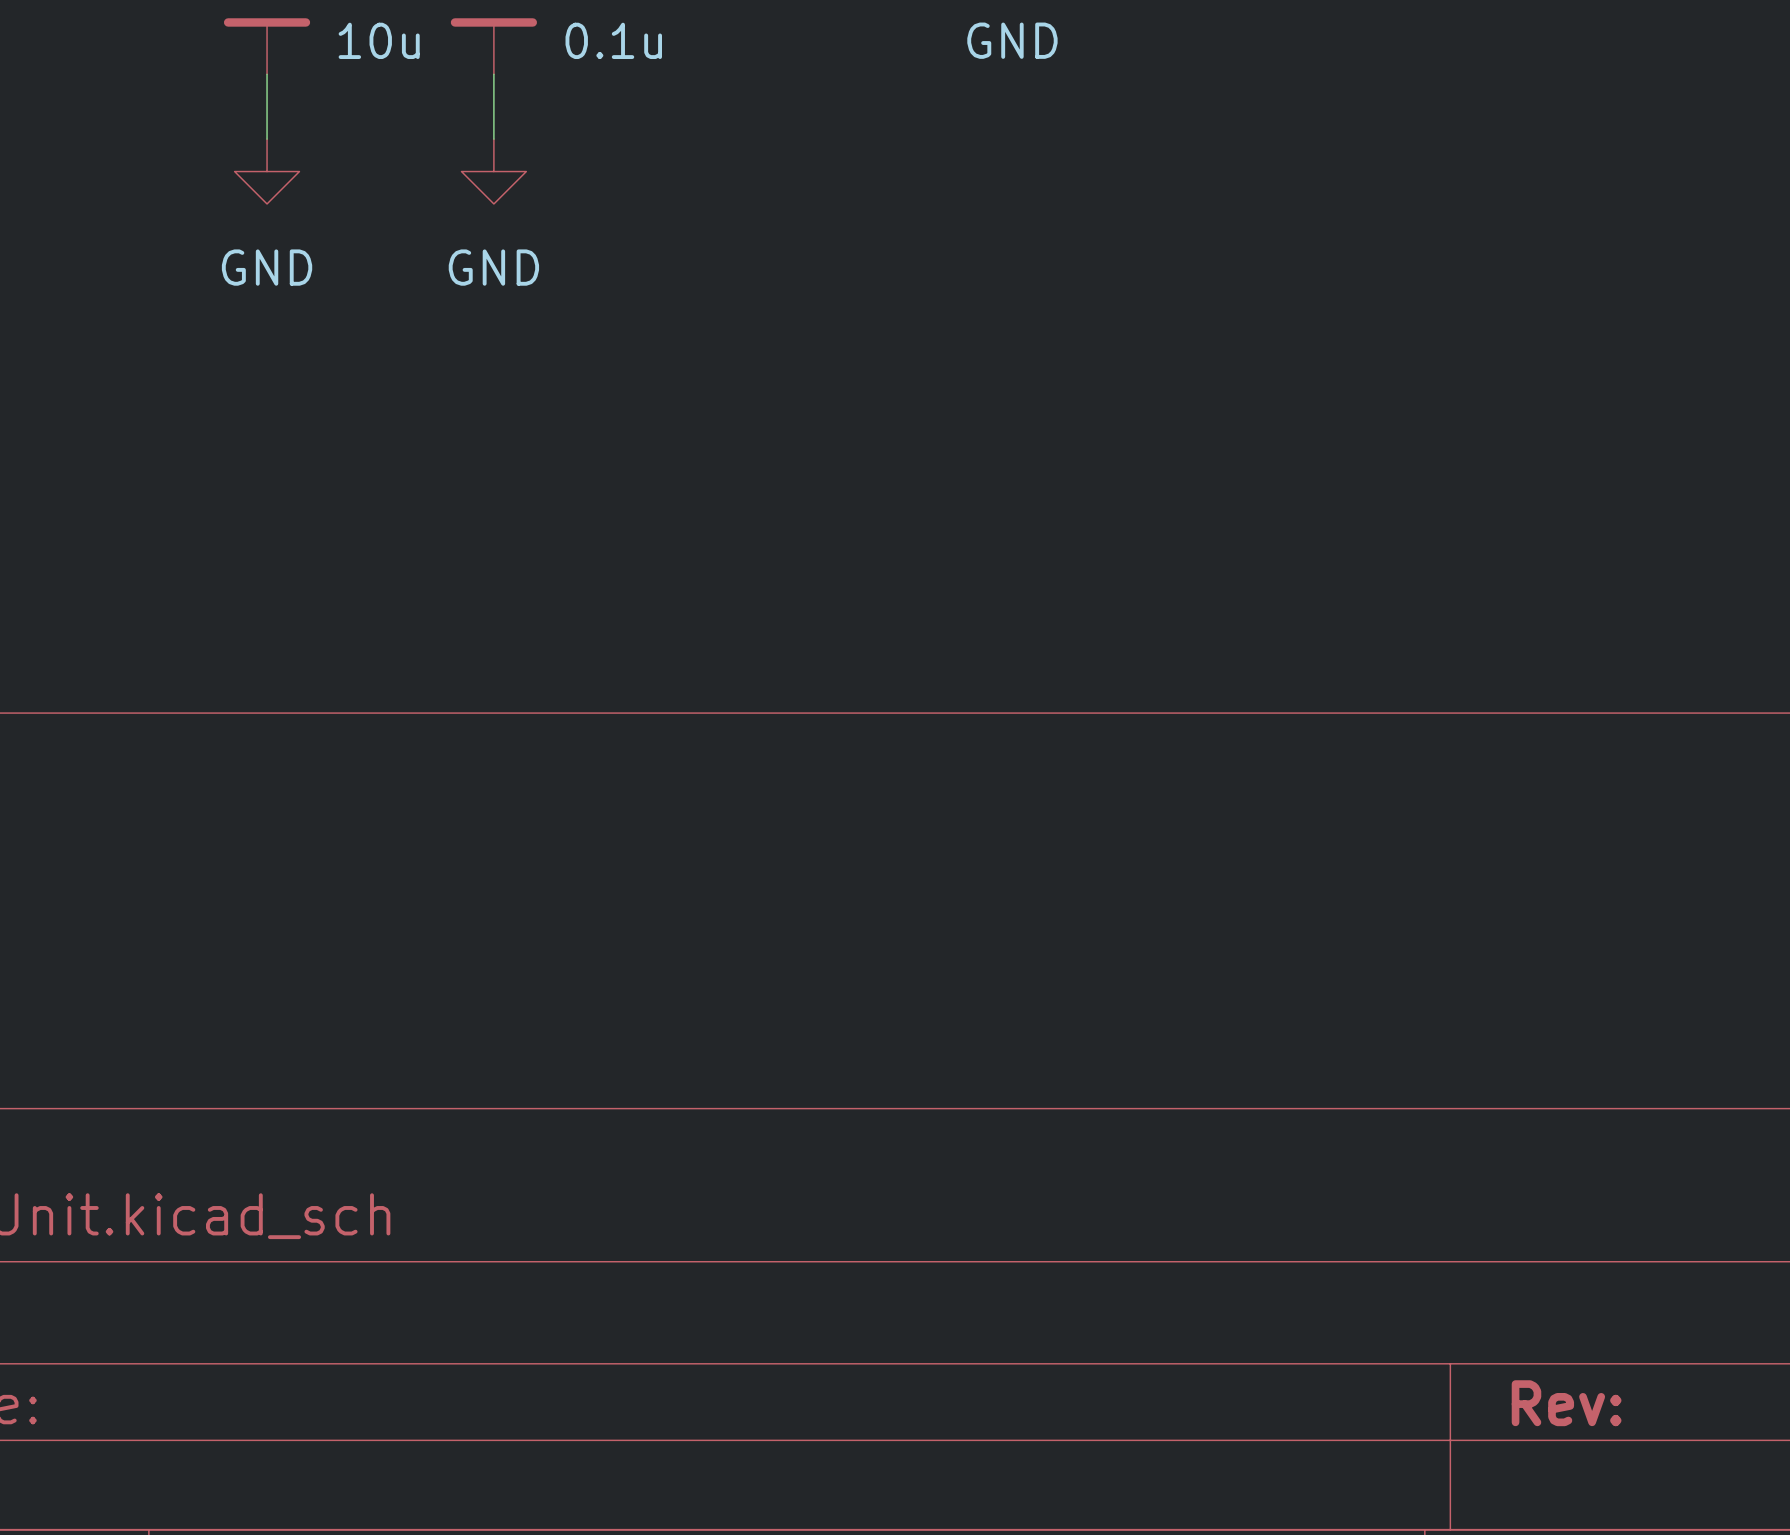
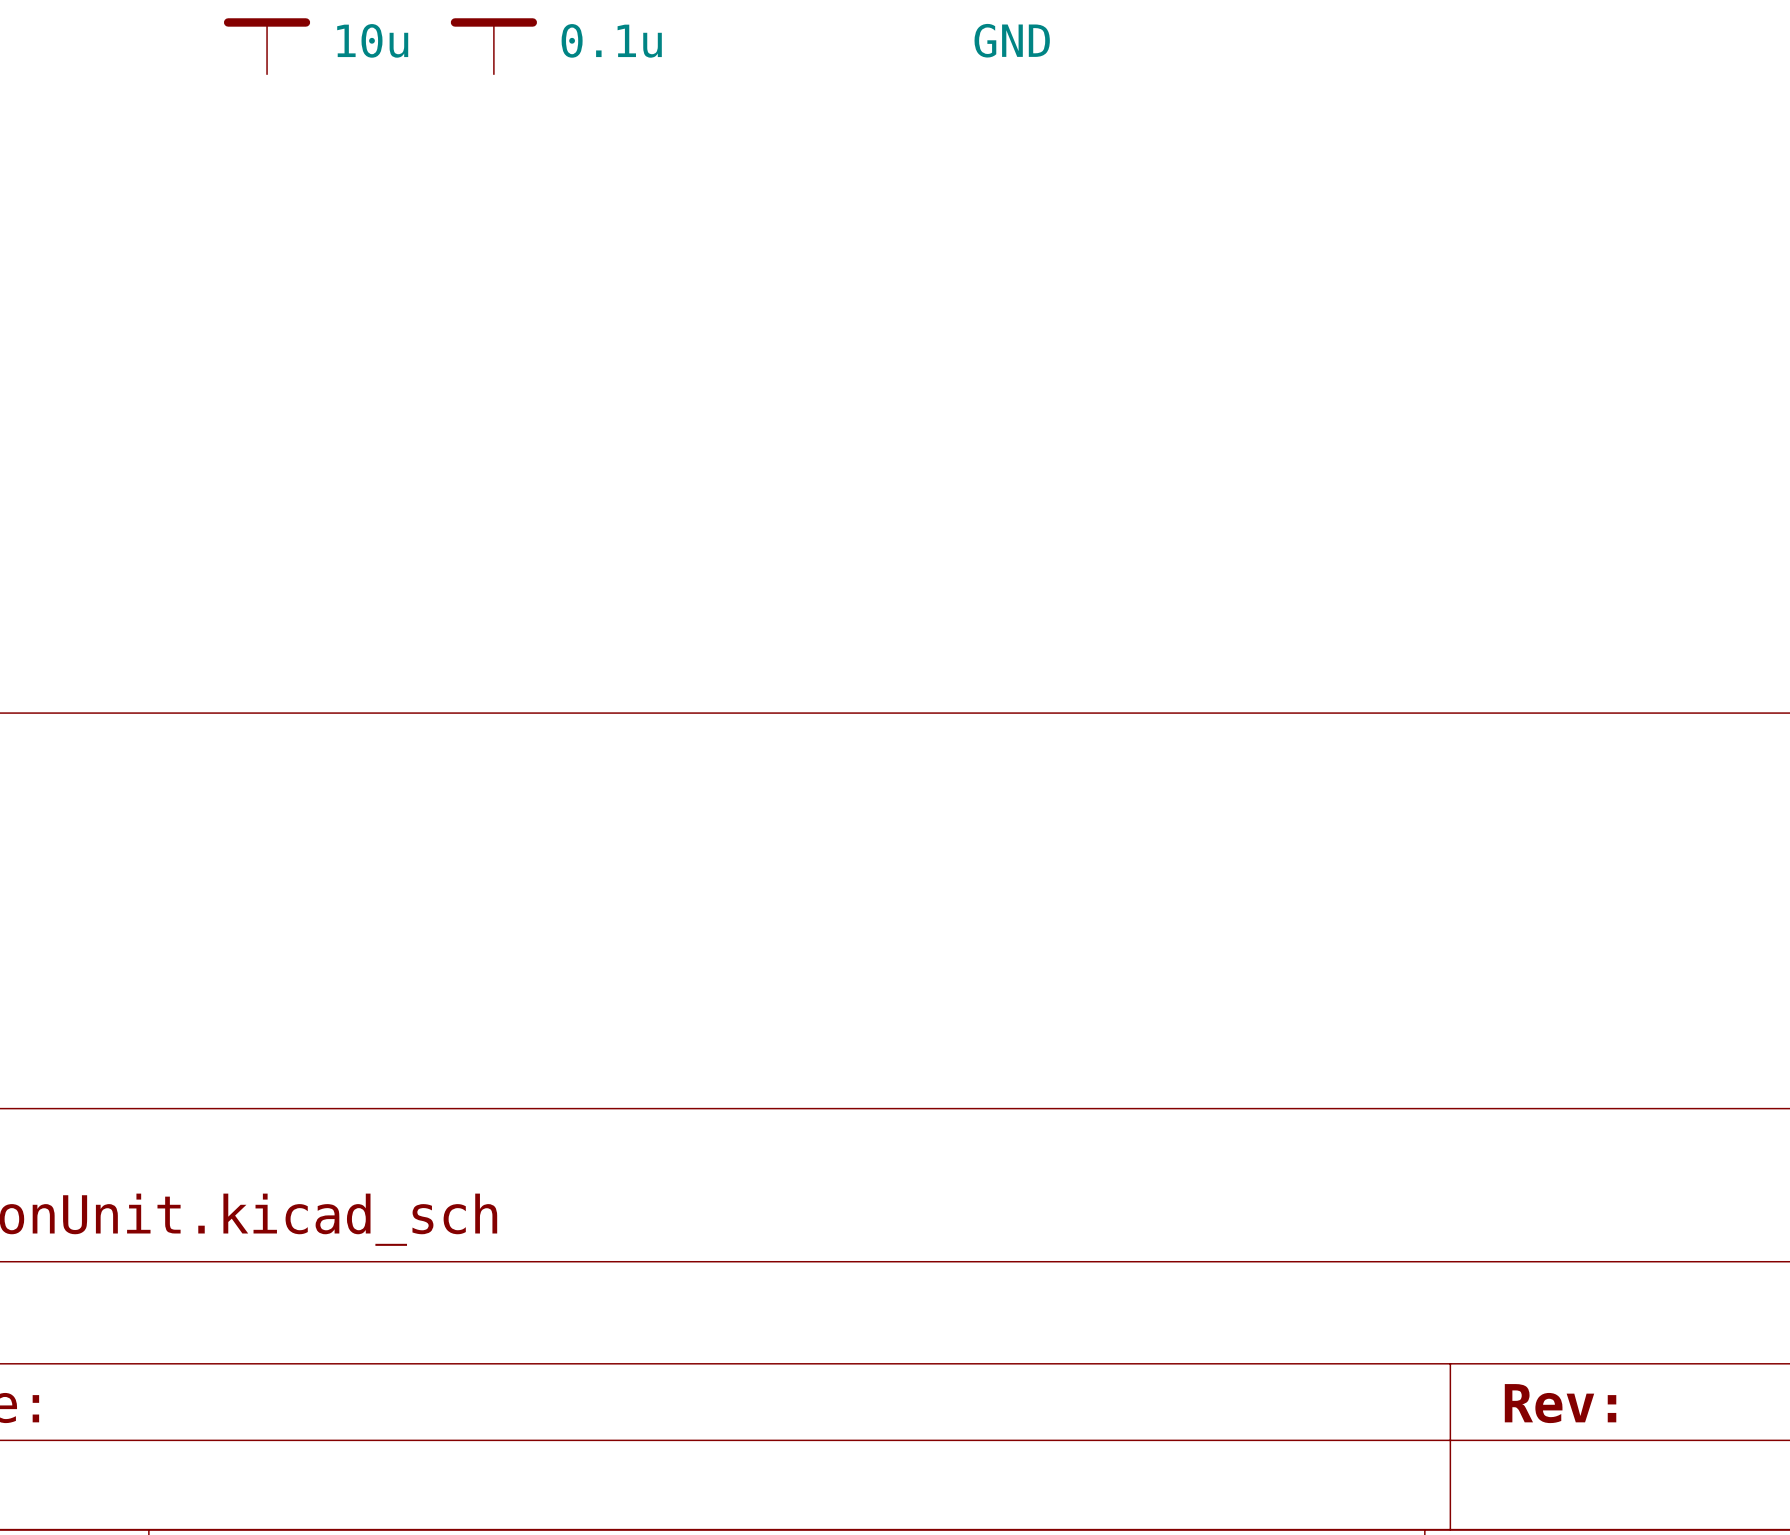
wire: (267, 74) (267, 139) -> none
wire: (493, 74) (493, 139) -> none
power symbol: GND (267, 171) -> none
power symbol: GND (493, 171) -> none

